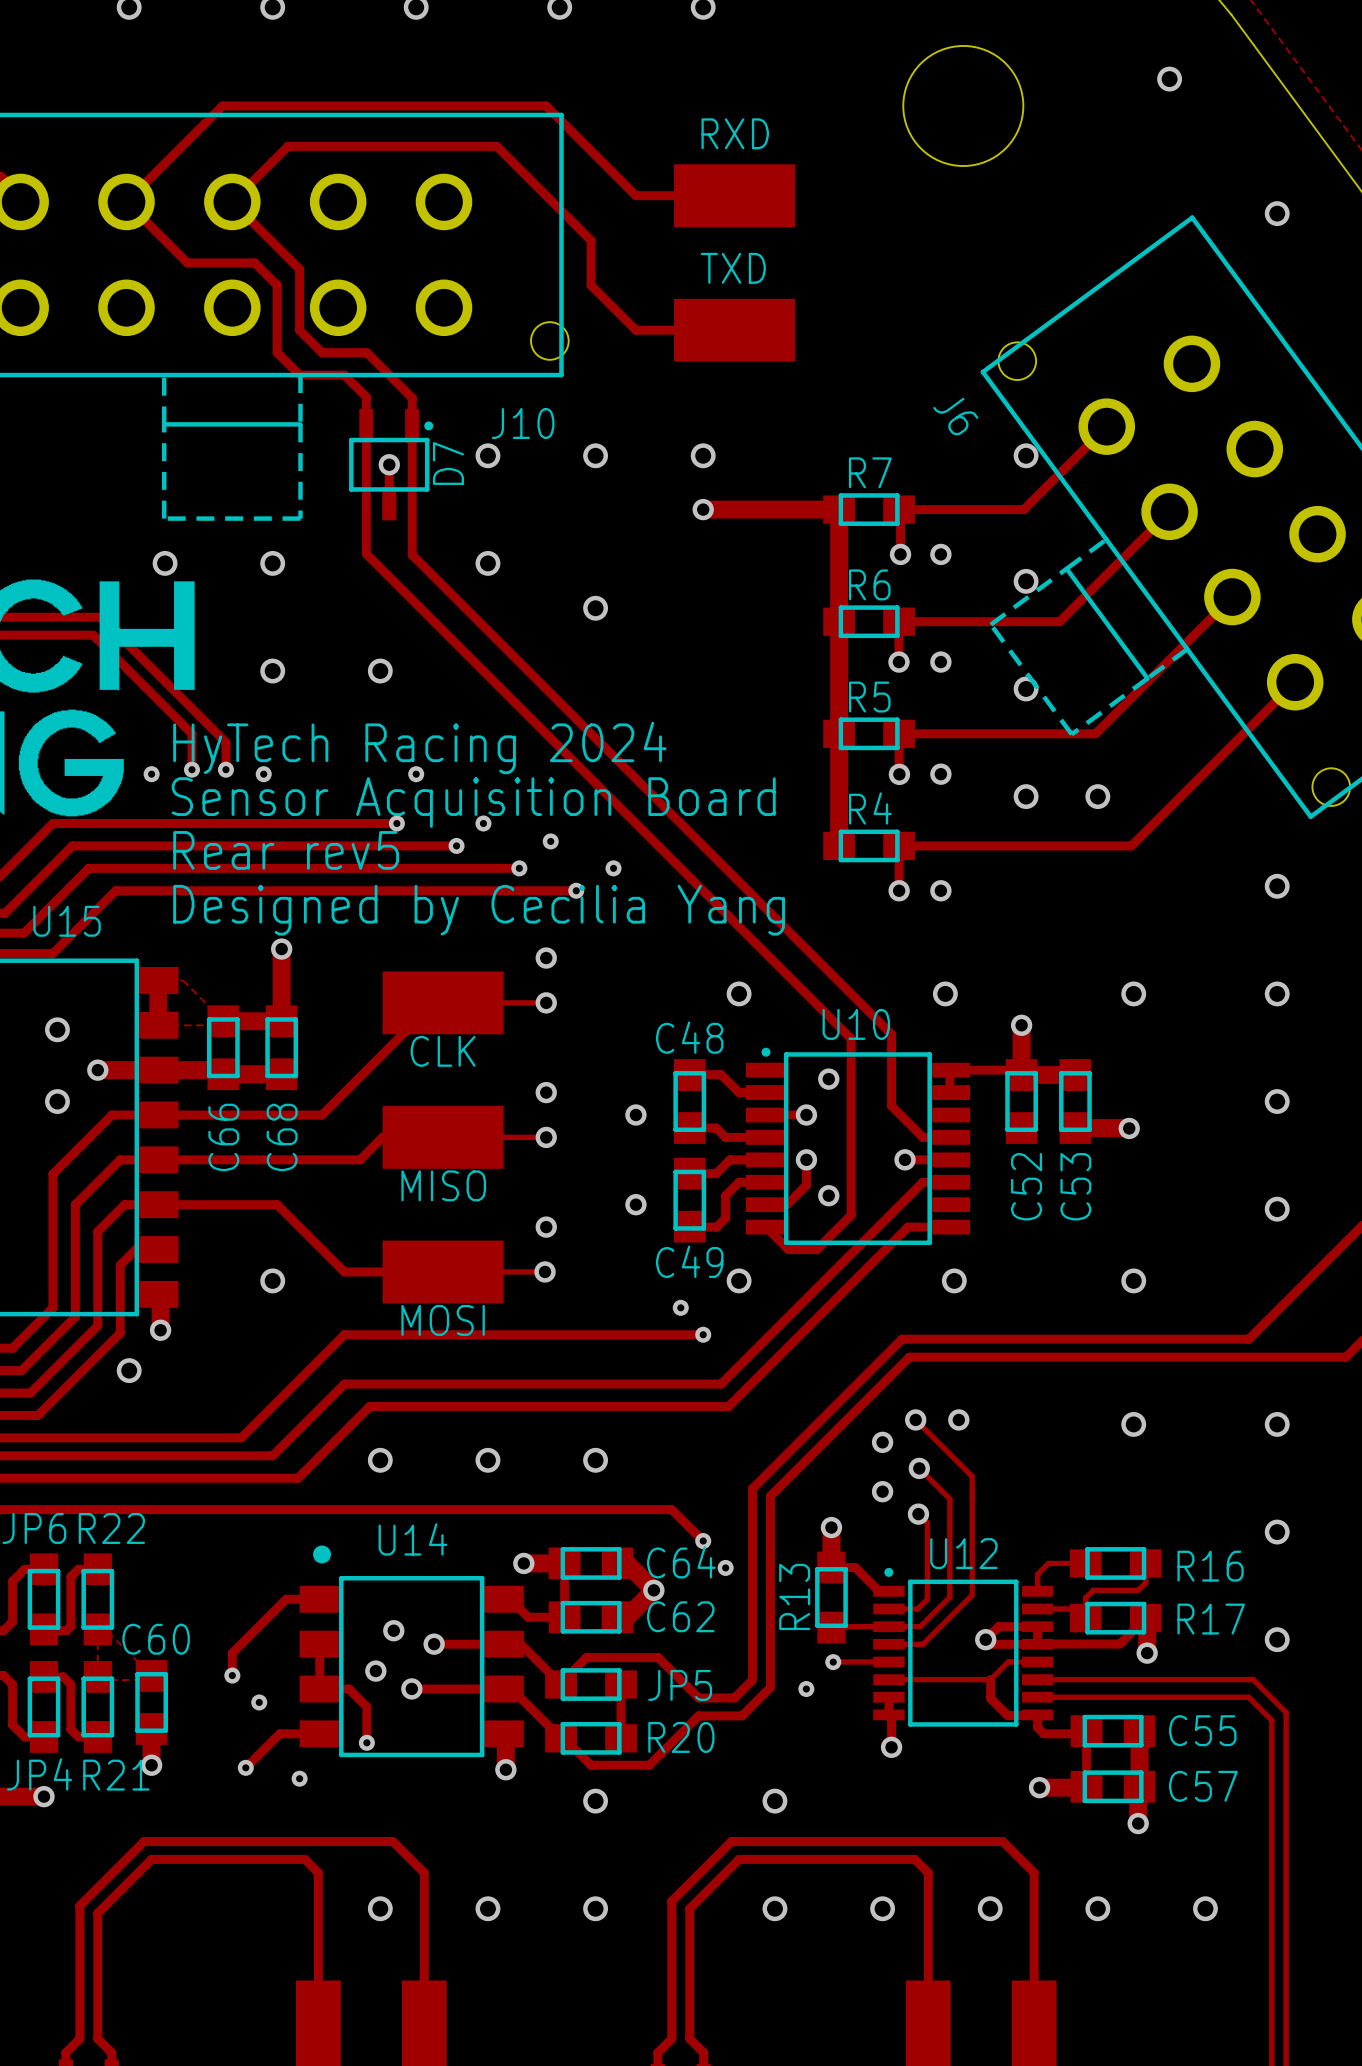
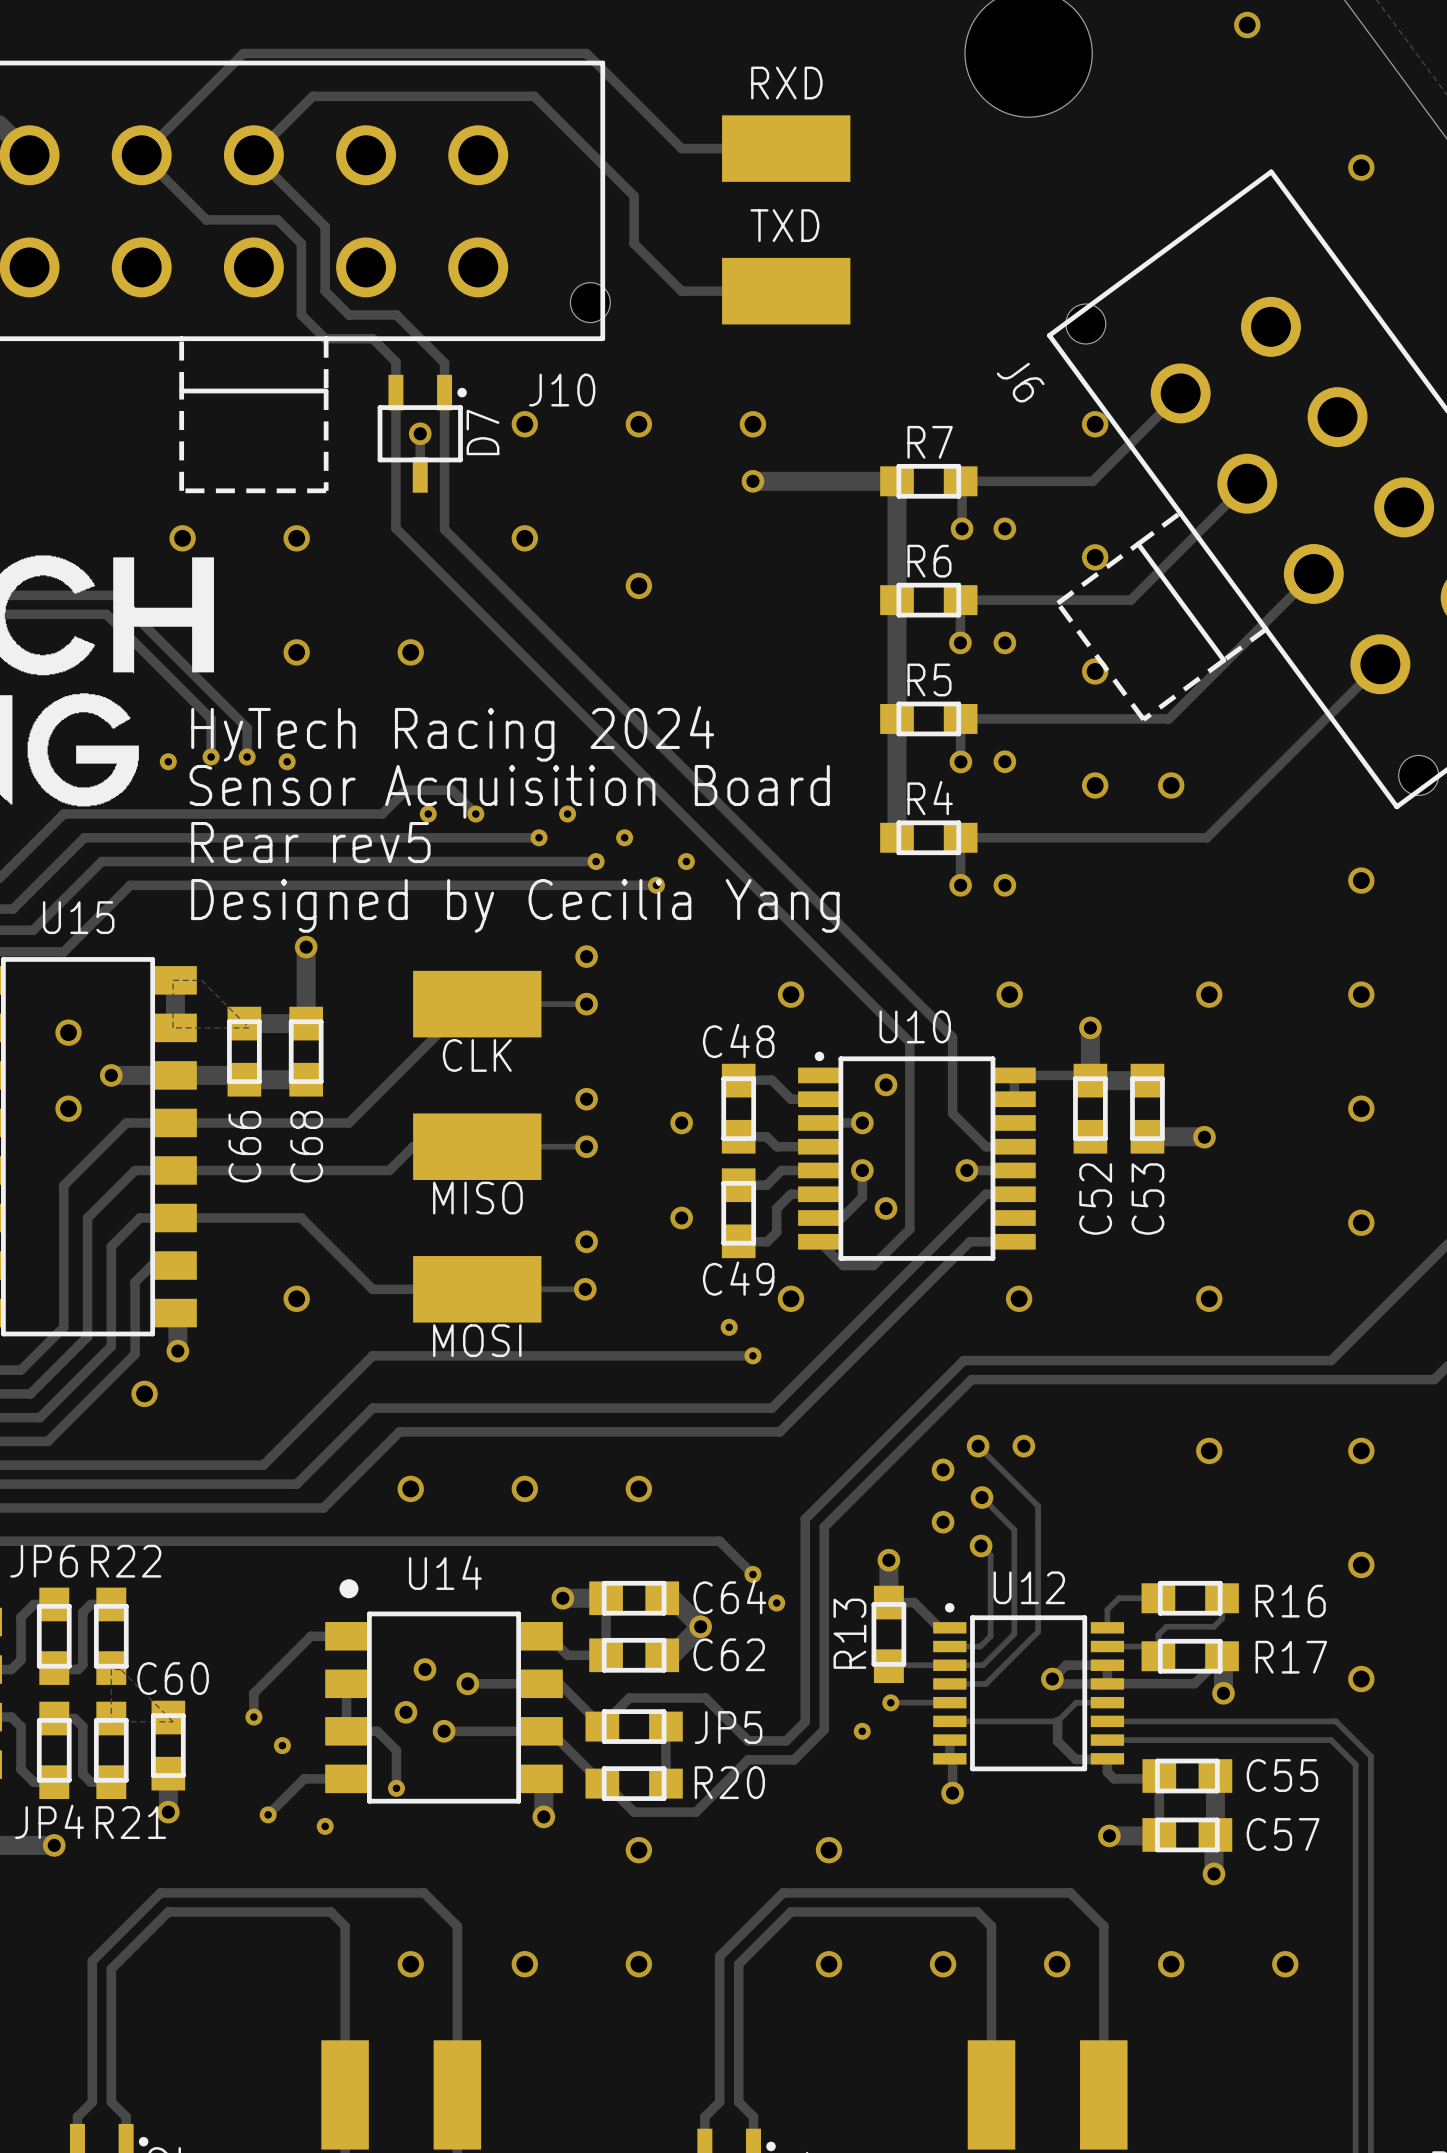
via: (416, 774) -> none
track: (353, 823) (396, 823) -> (382, 814) (405, 790) (452, 790) (475, 814)
via: none -> (475, 814)
via: (483, 823) -> none
via: none -> (567, 814)
via: (550, 841) -> none
track: none -> (491, 837) (539, 837)
via: (456, 845) -> none
via: none -> (539, 837)
via: none -> (624, 837)
track: none -> (558, 861) (596, 861)
via: (519, 868) -> none
via: none -> (596, 861)
via: (613, 868) -> none
via: none -> (686, 861)
track: none -> (618, 885) (656, 885)
via: (576, 890) -> none
via: none -> (656, 885)

